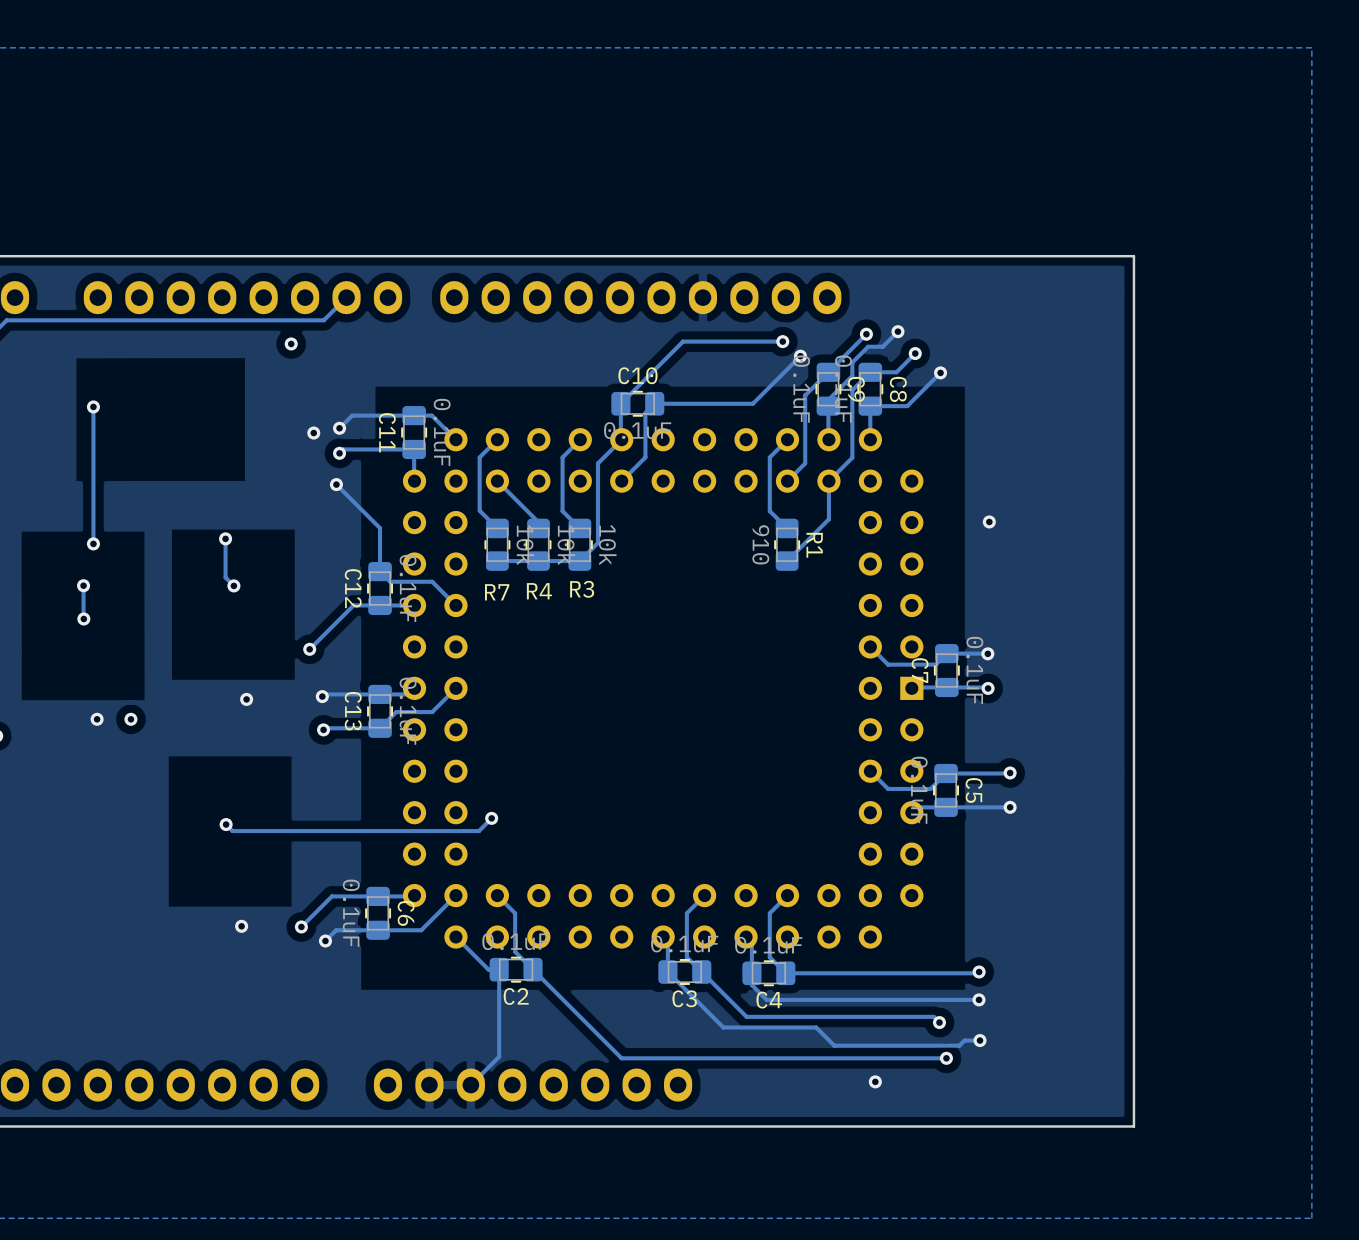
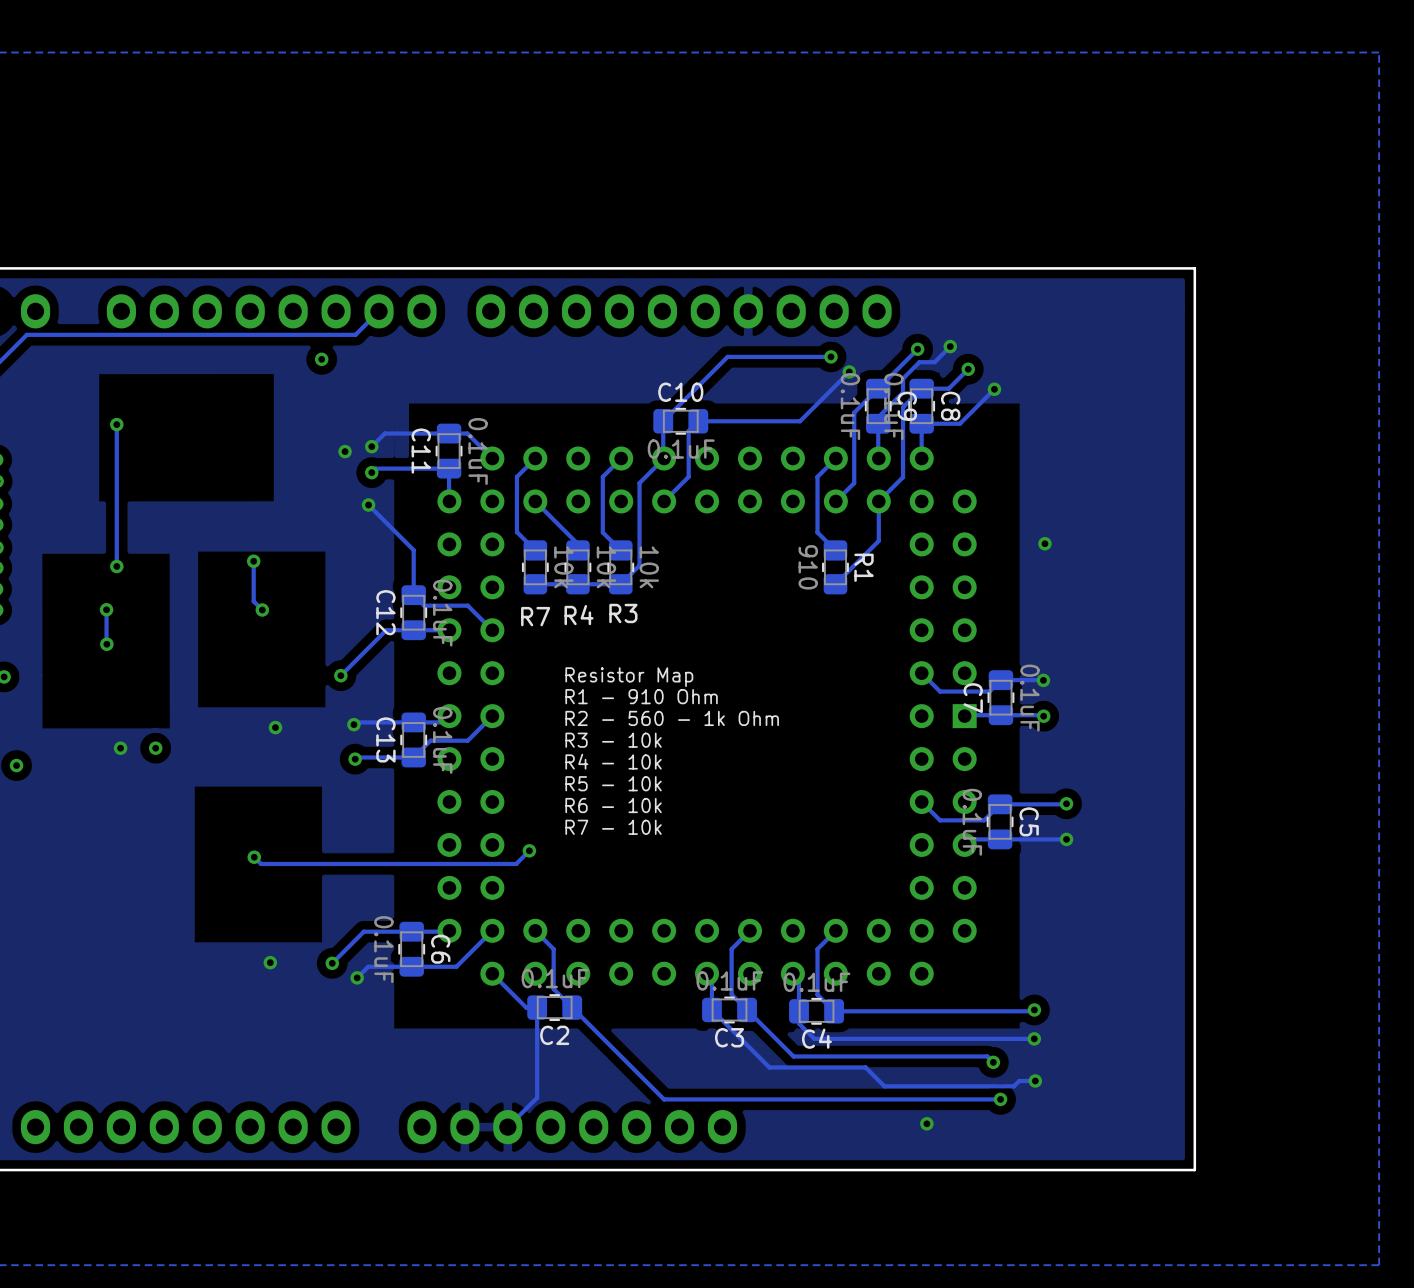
text: none -> Resistor Map (629, 677)
text: none -> R1 - 910 Ohm (641, 696)
text: none -> R2 - 560 - 1k Ohm (672, 718)
text: none -> R3 - 10k (613, 740)
text: none -> R4 - 10k (613, 761)
text: none -> R5 - 10k (613, 783)
text: none -> R6 - 10k (613, 805)
text: none -> R7 - 10k (613, 827)

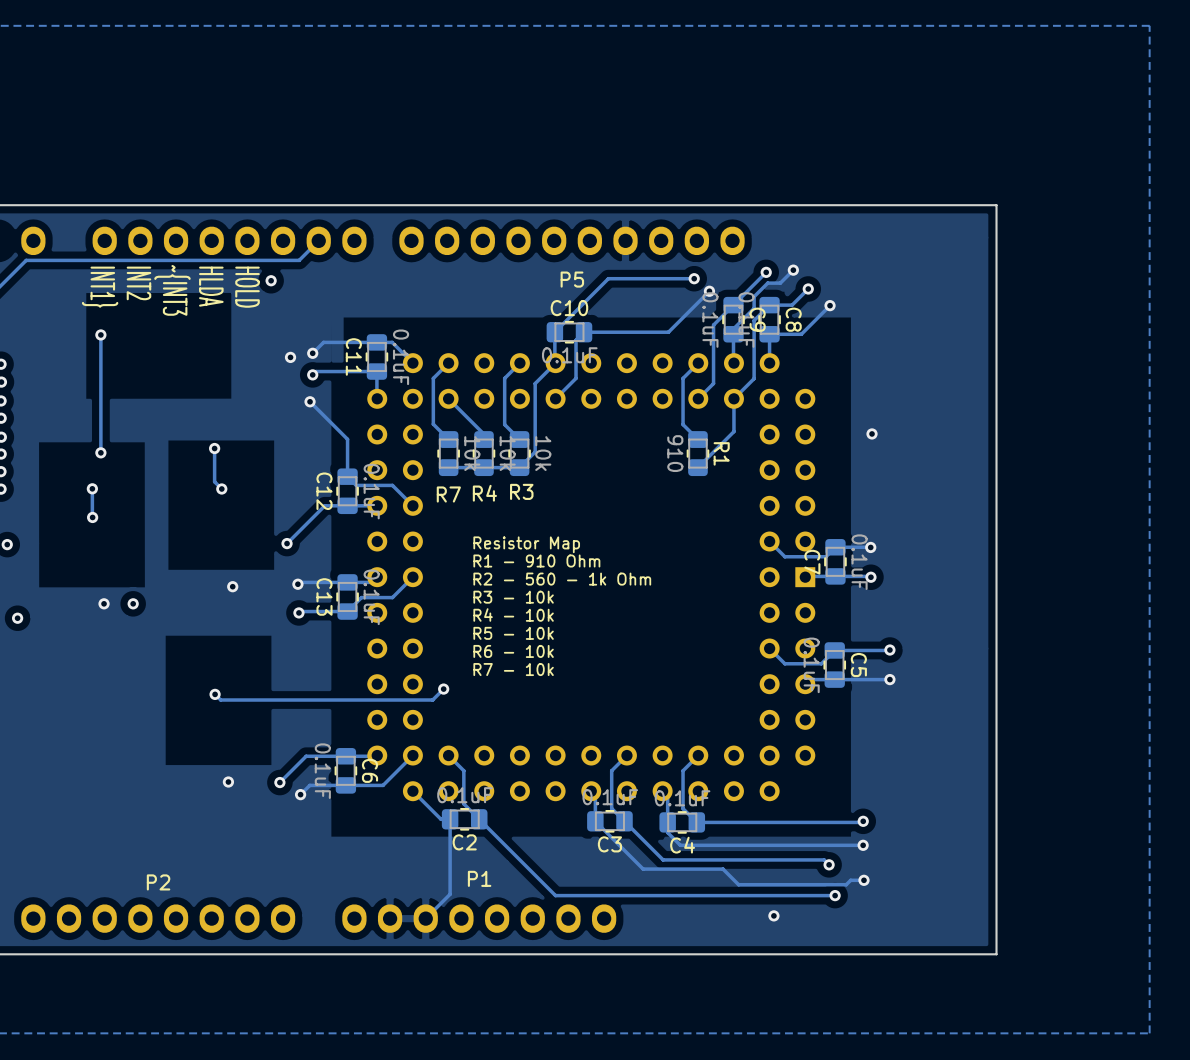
P5 name: none -> P5 (572, 279)
text: none -> INT2 (138, 283)
text: none -> HLDA (211, 286)
text: none -> INT1} (100, 287)
text: none -> HOLD (247, 287)
text: none -> ~{INT3 (172, 290)
P1 name: none -> P1 (479, 878)
P2 name: none -> P2 (158, 882)

